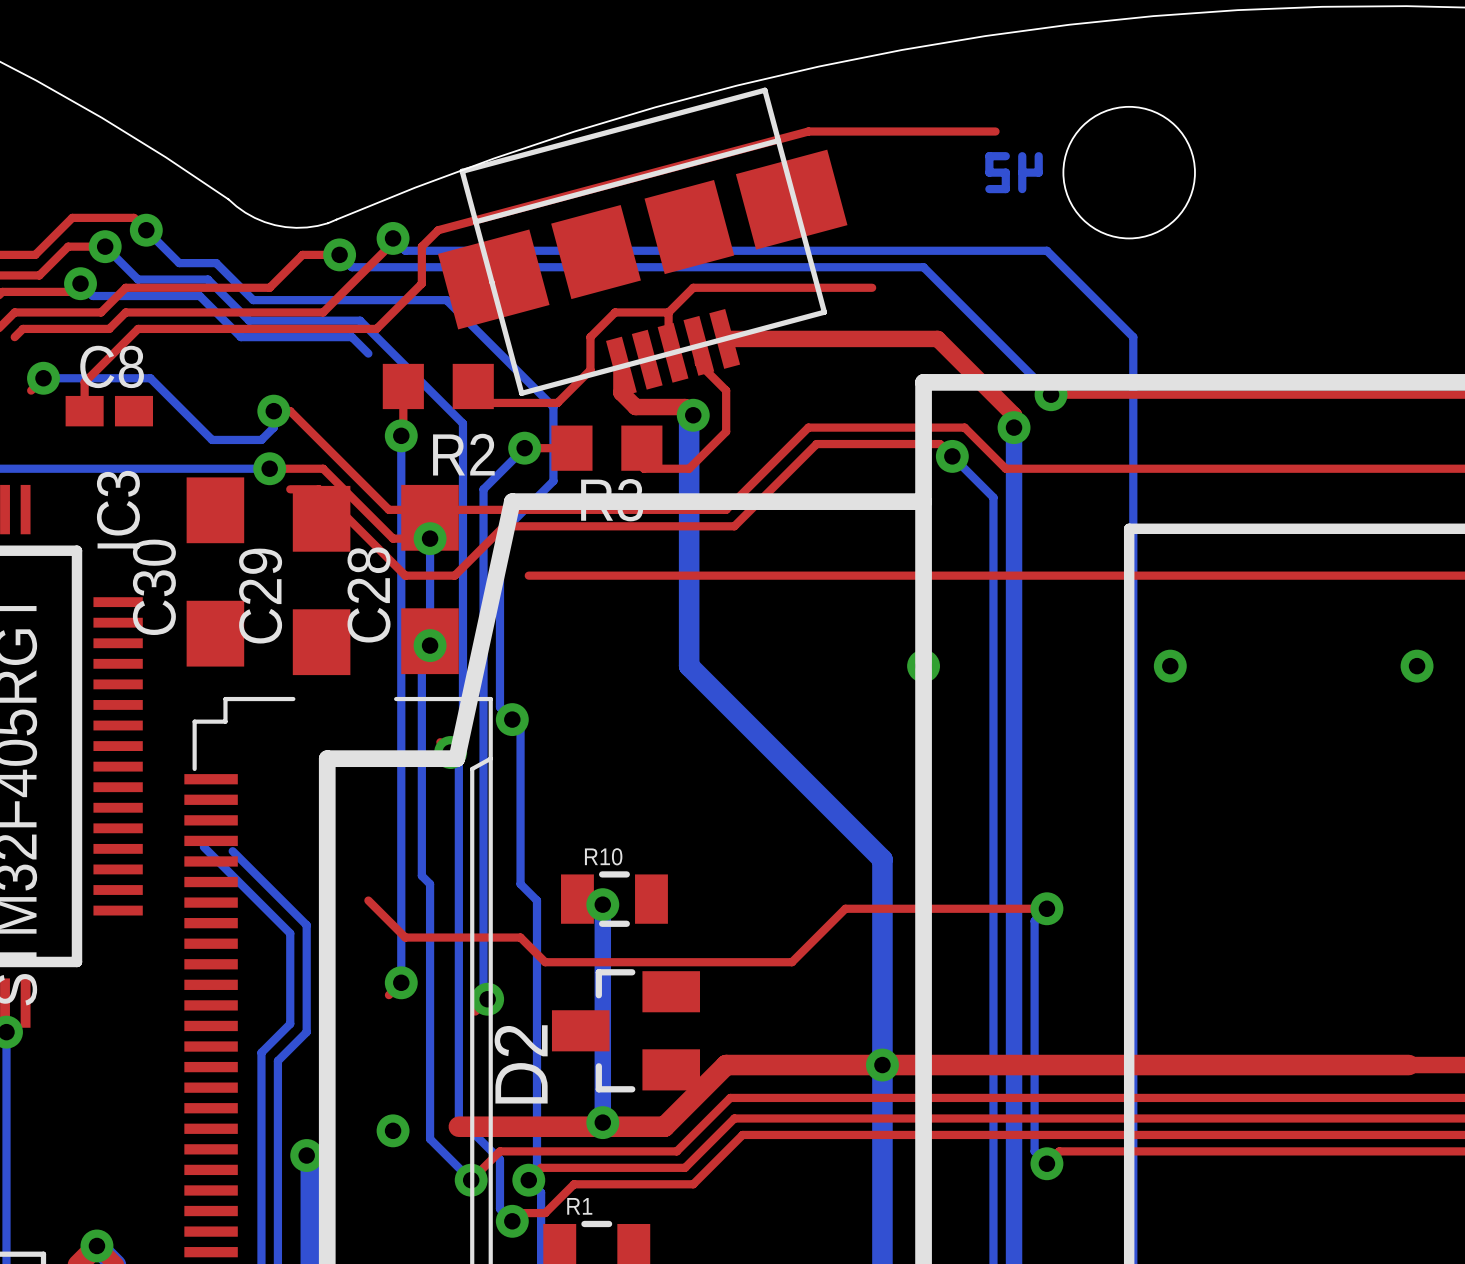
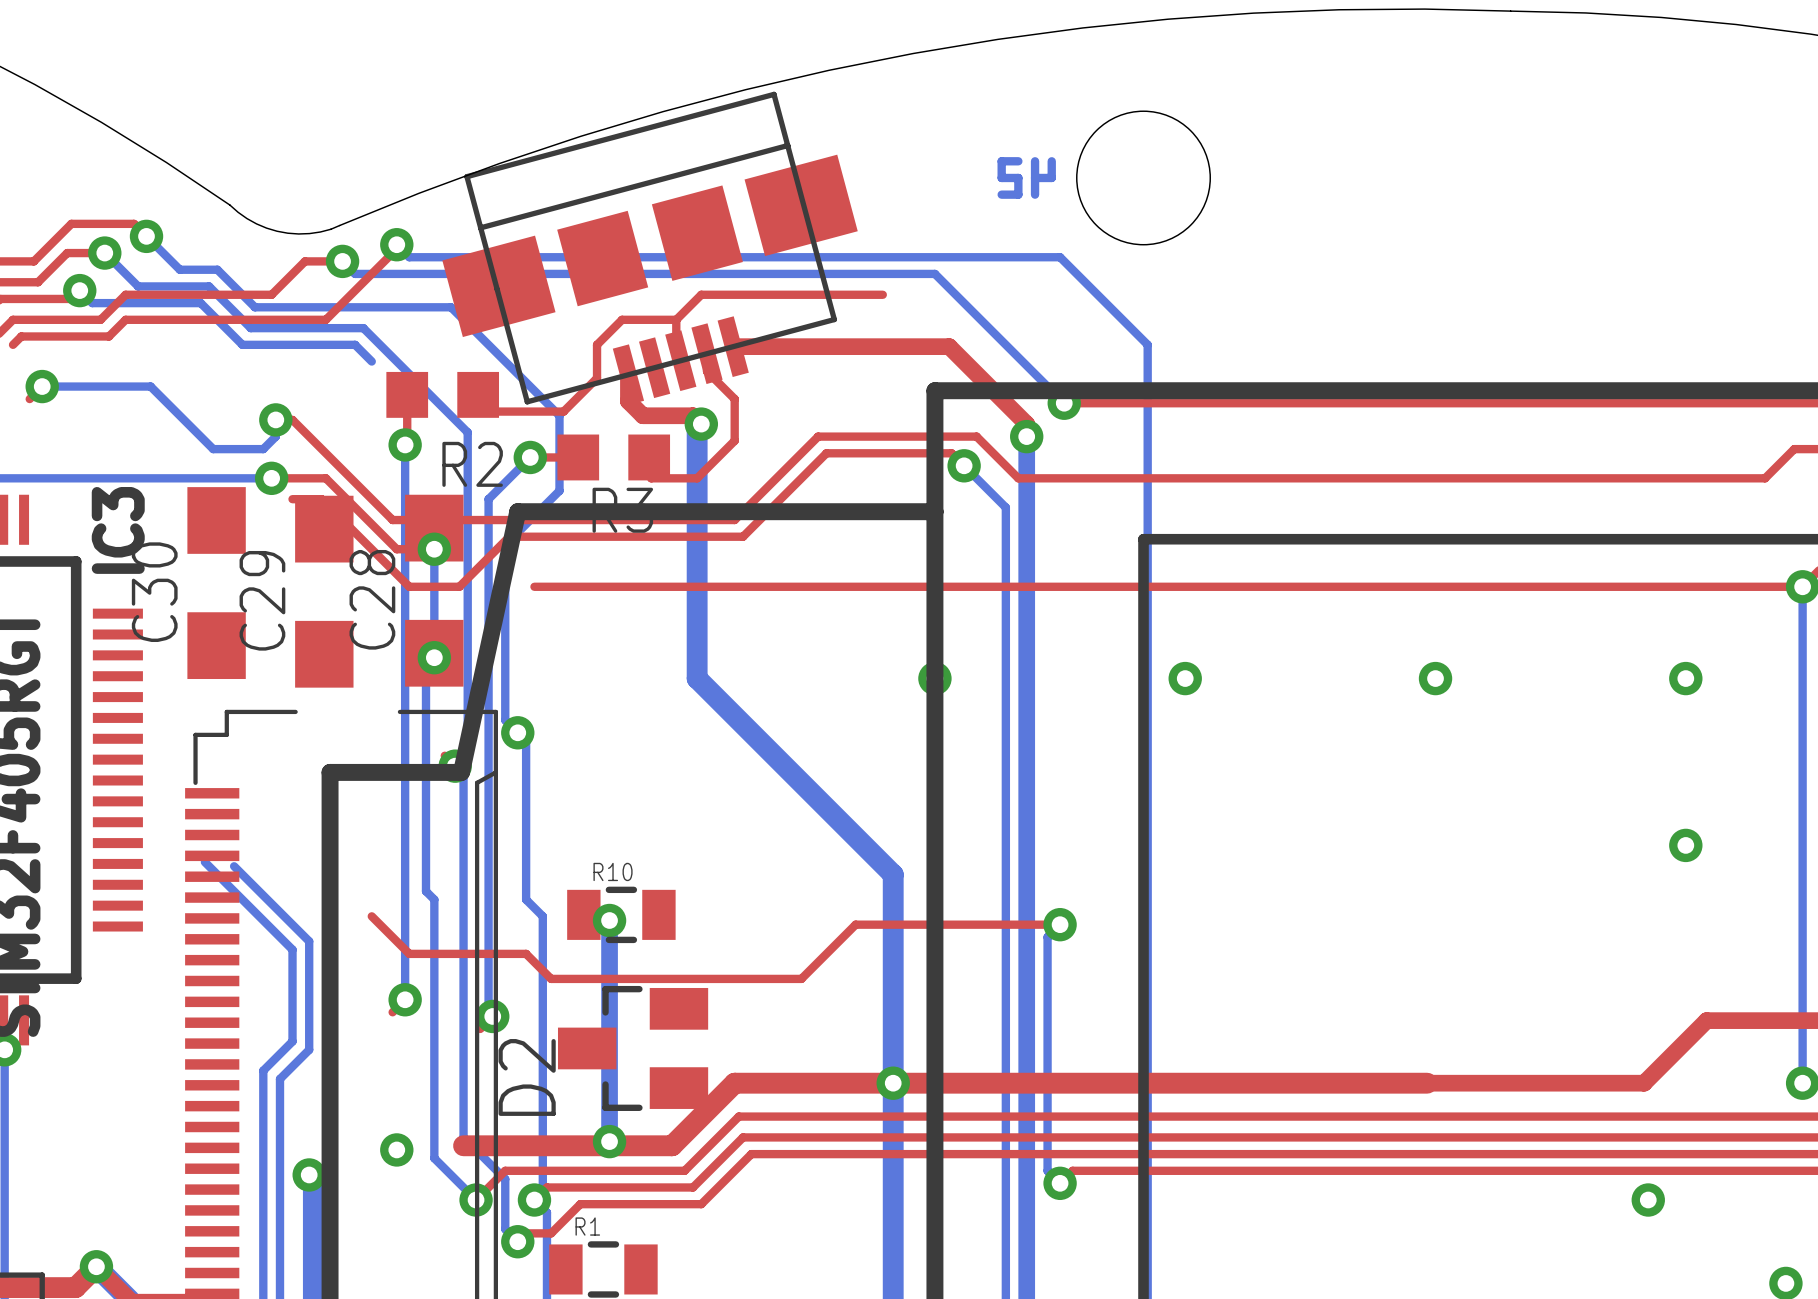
top track: (995, 131) (808, 131) (438, 230) (421, 246) (421, 283) (376, 328) (138, 328) (84, 382) (84, 411) (78, 417) -> none
C8: (109, 411) -> none

